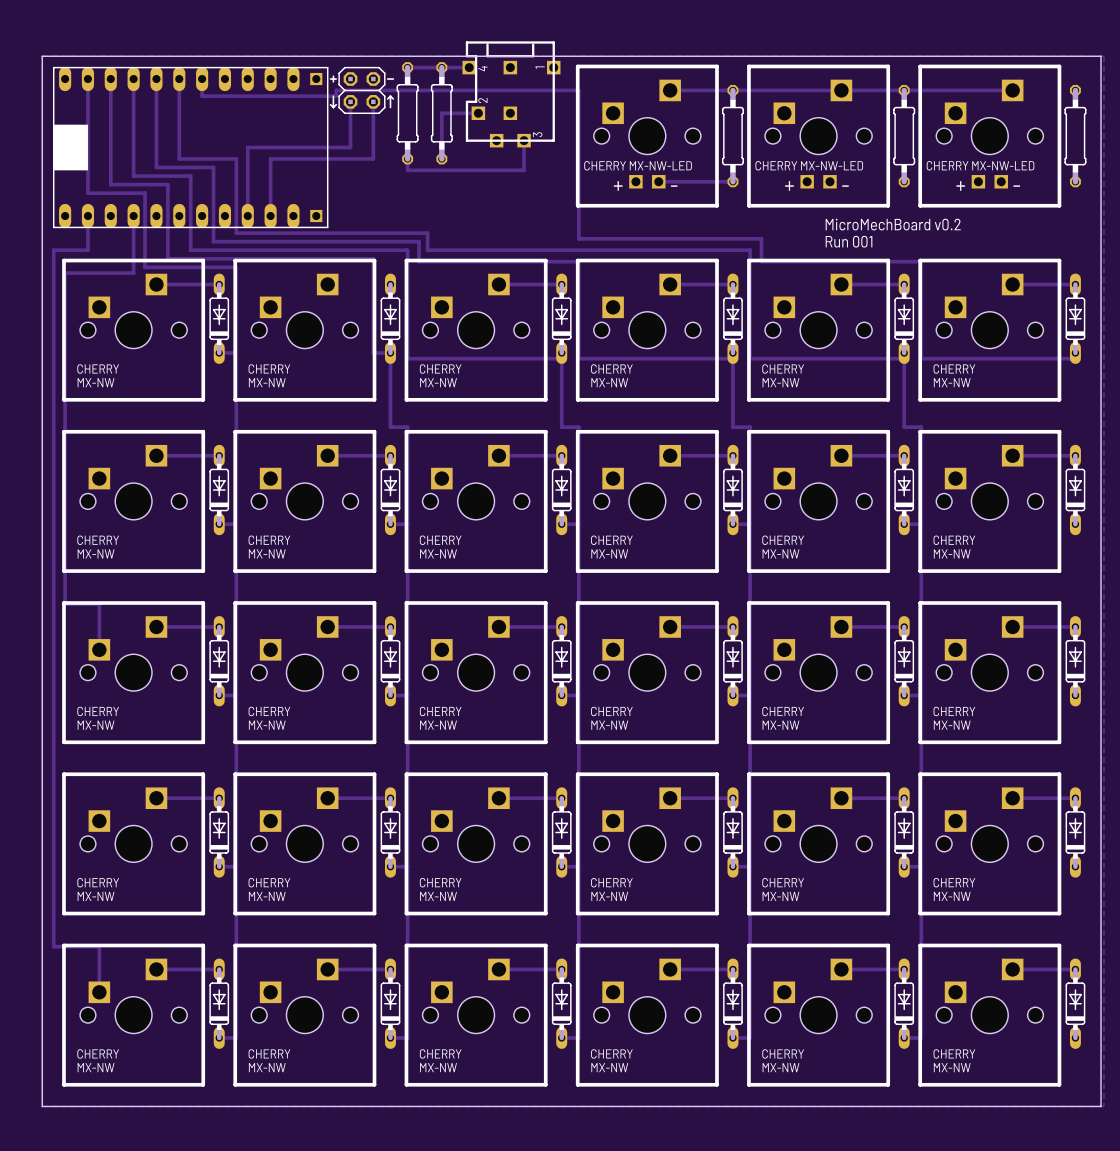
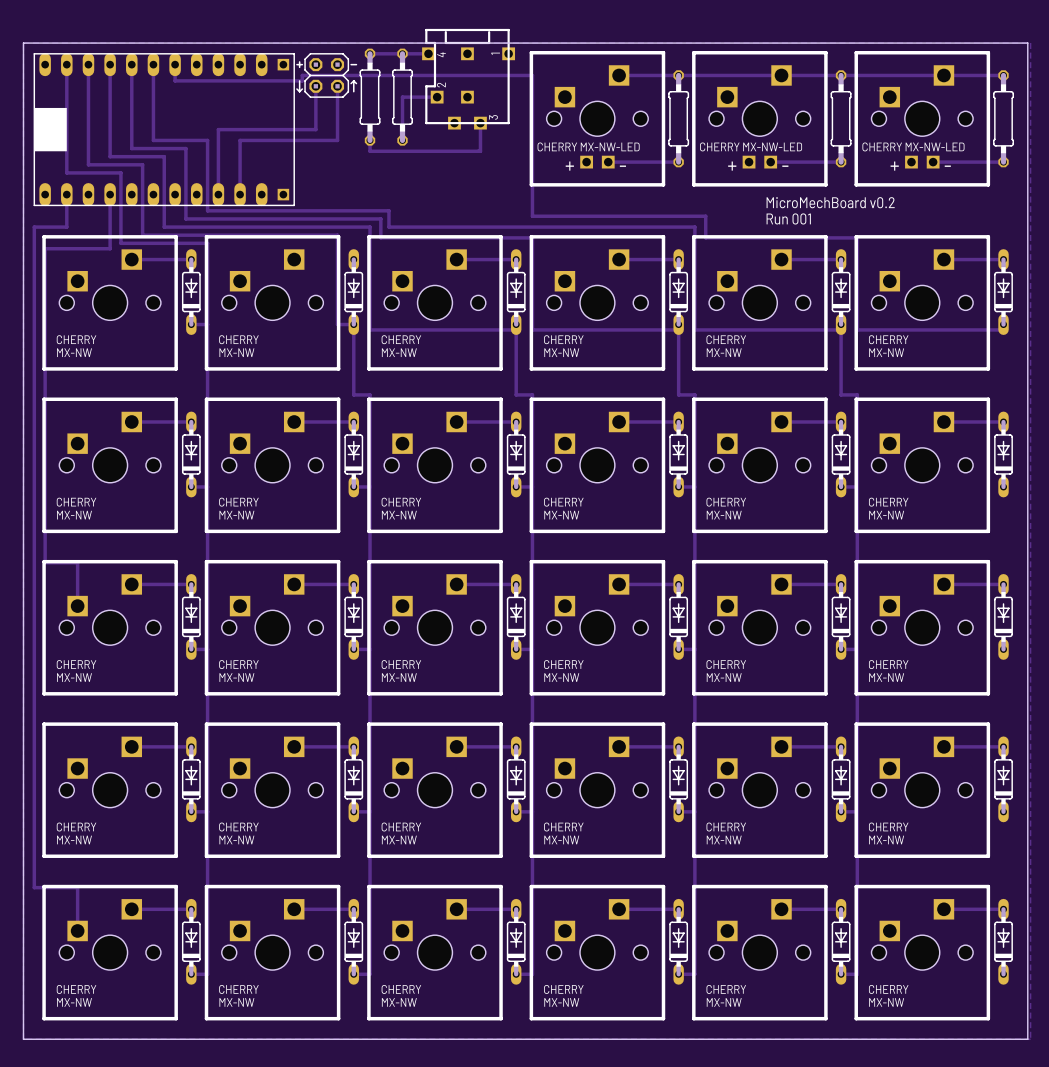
track: none -> (943, 75) (1003, 75)
track: none -> (770, 162) (841, 162)
track: none -> (933, 162) (1003, 162)

